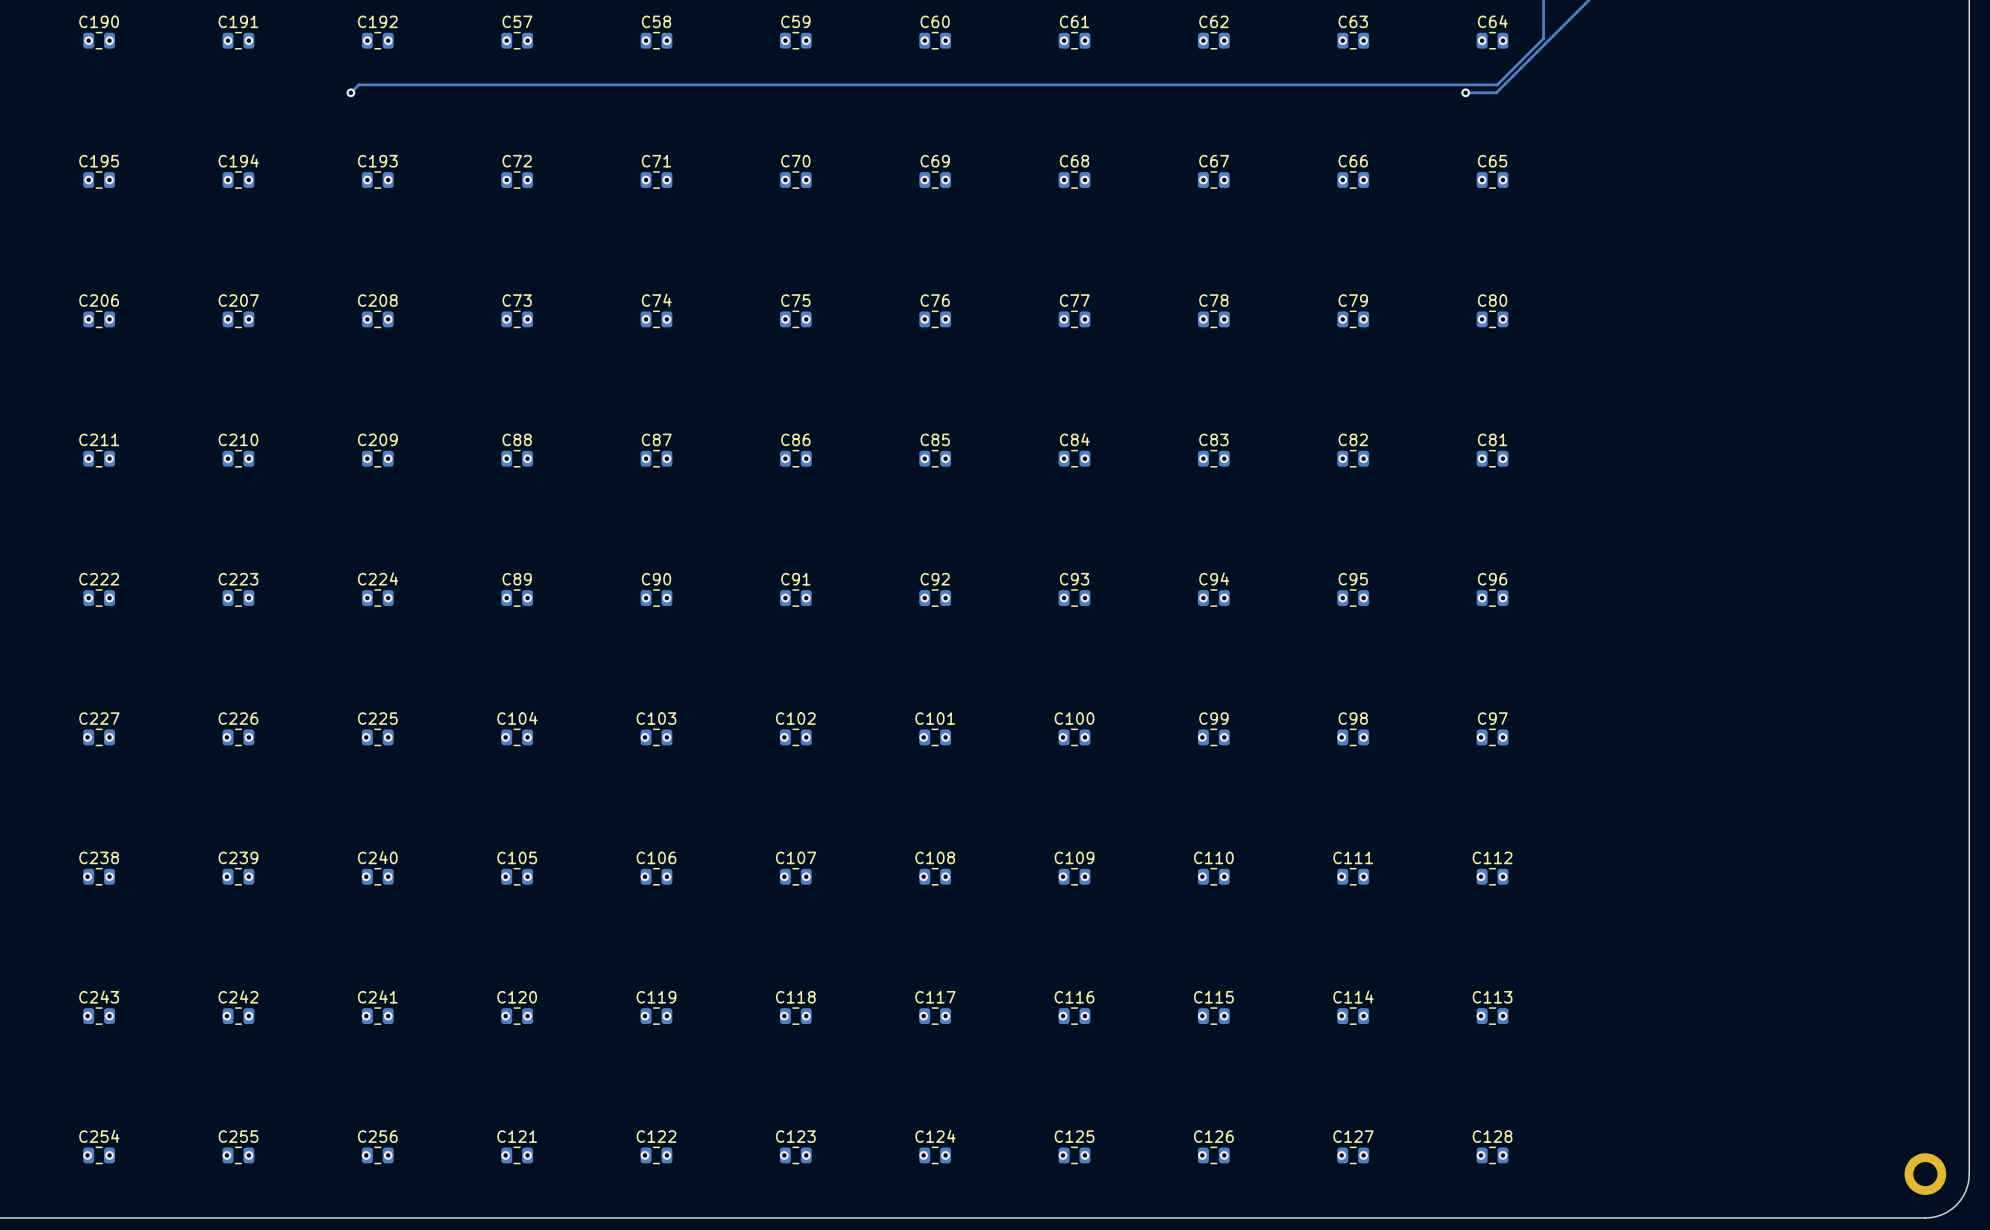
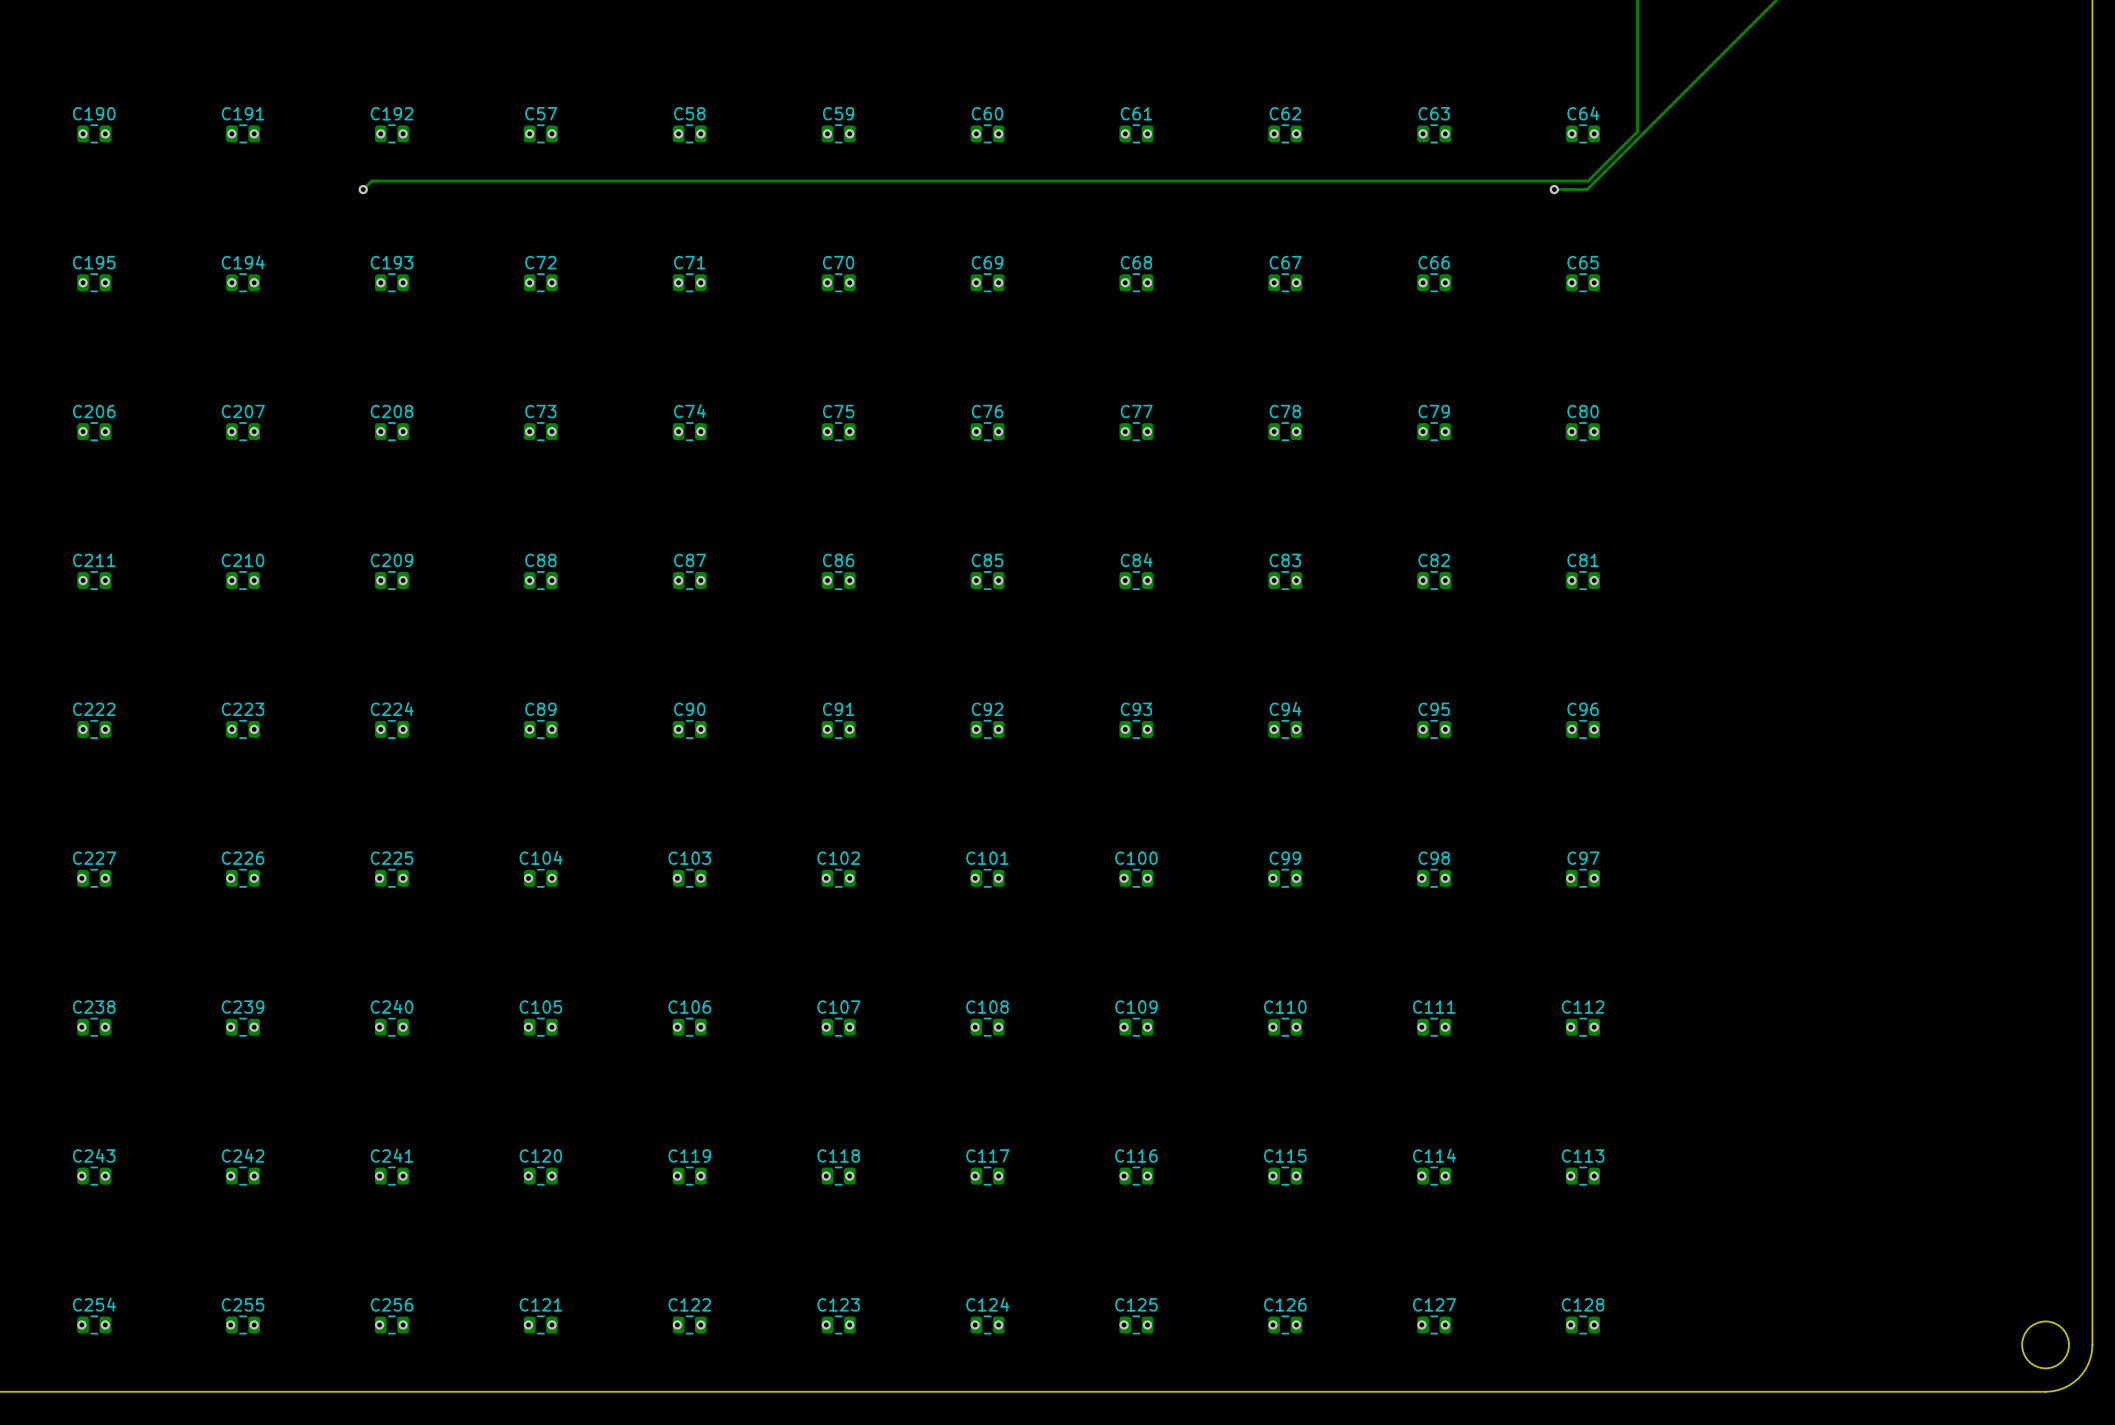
round board edge: none -> [2021, 1320, 2070, 1369]
part: (1925, 1174) -> none

